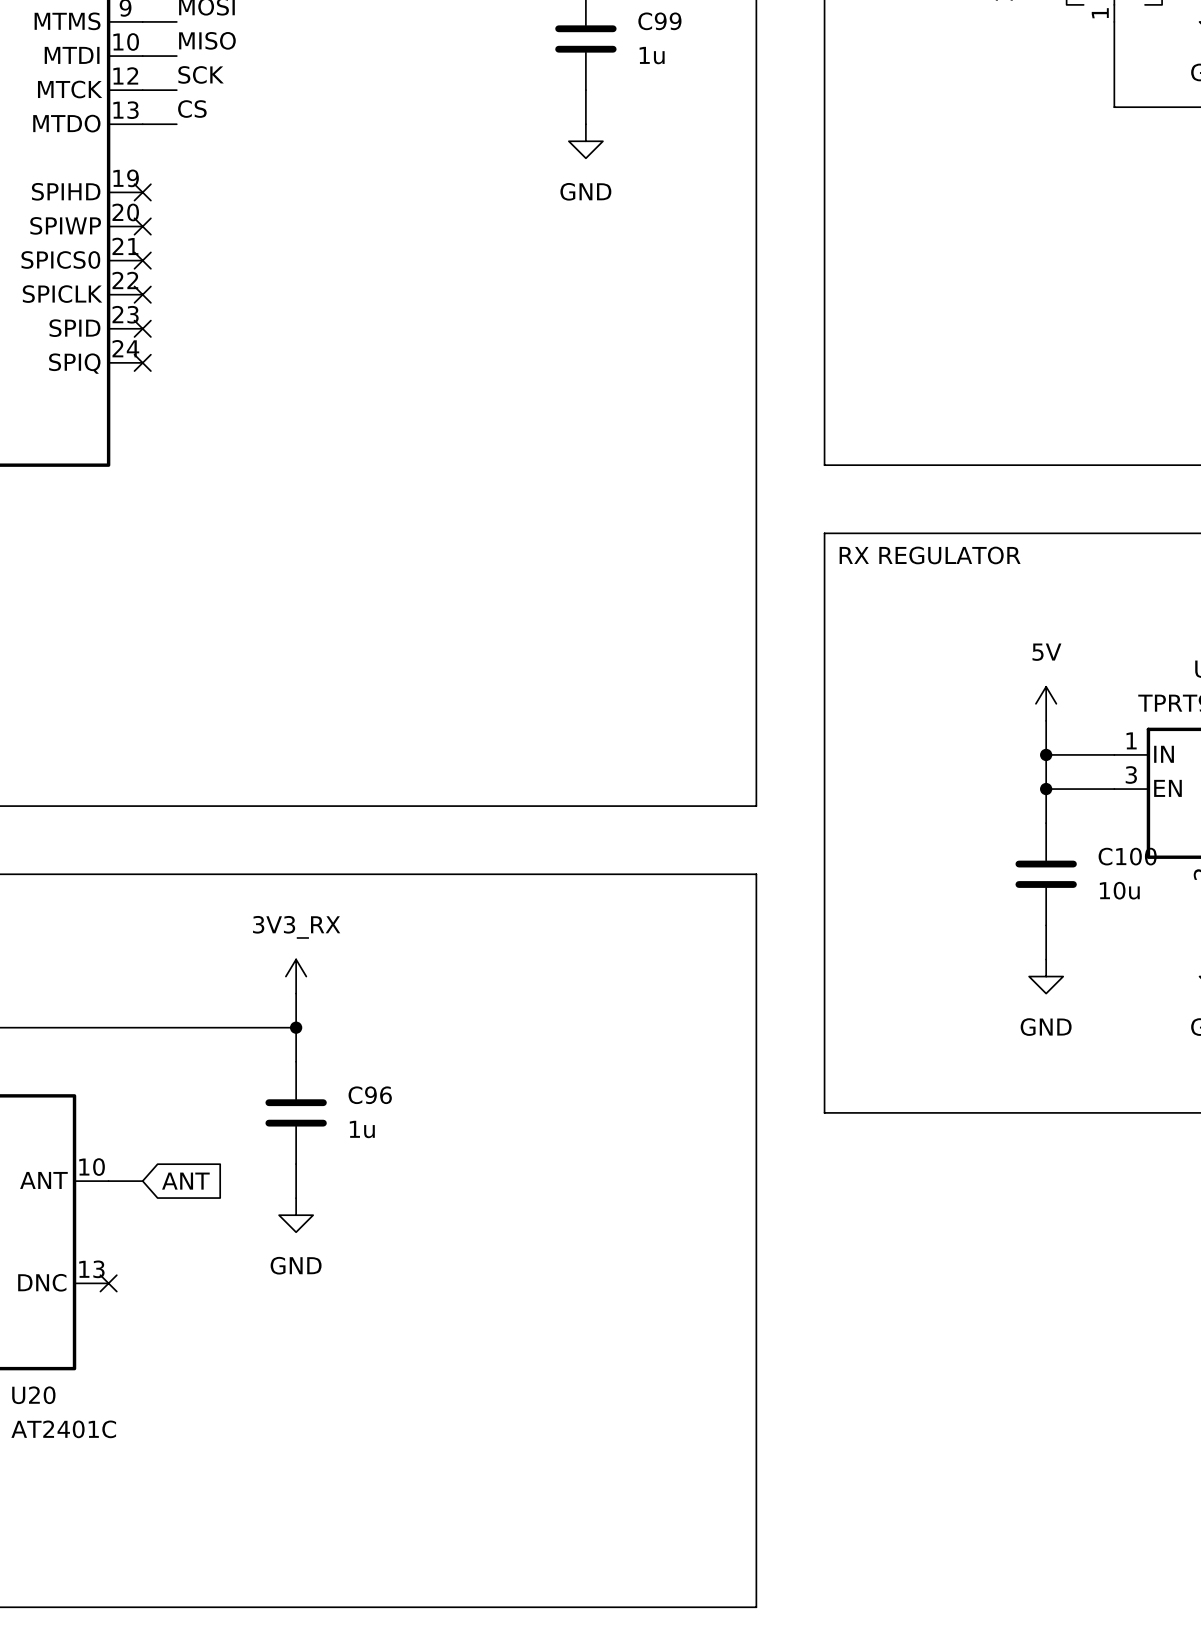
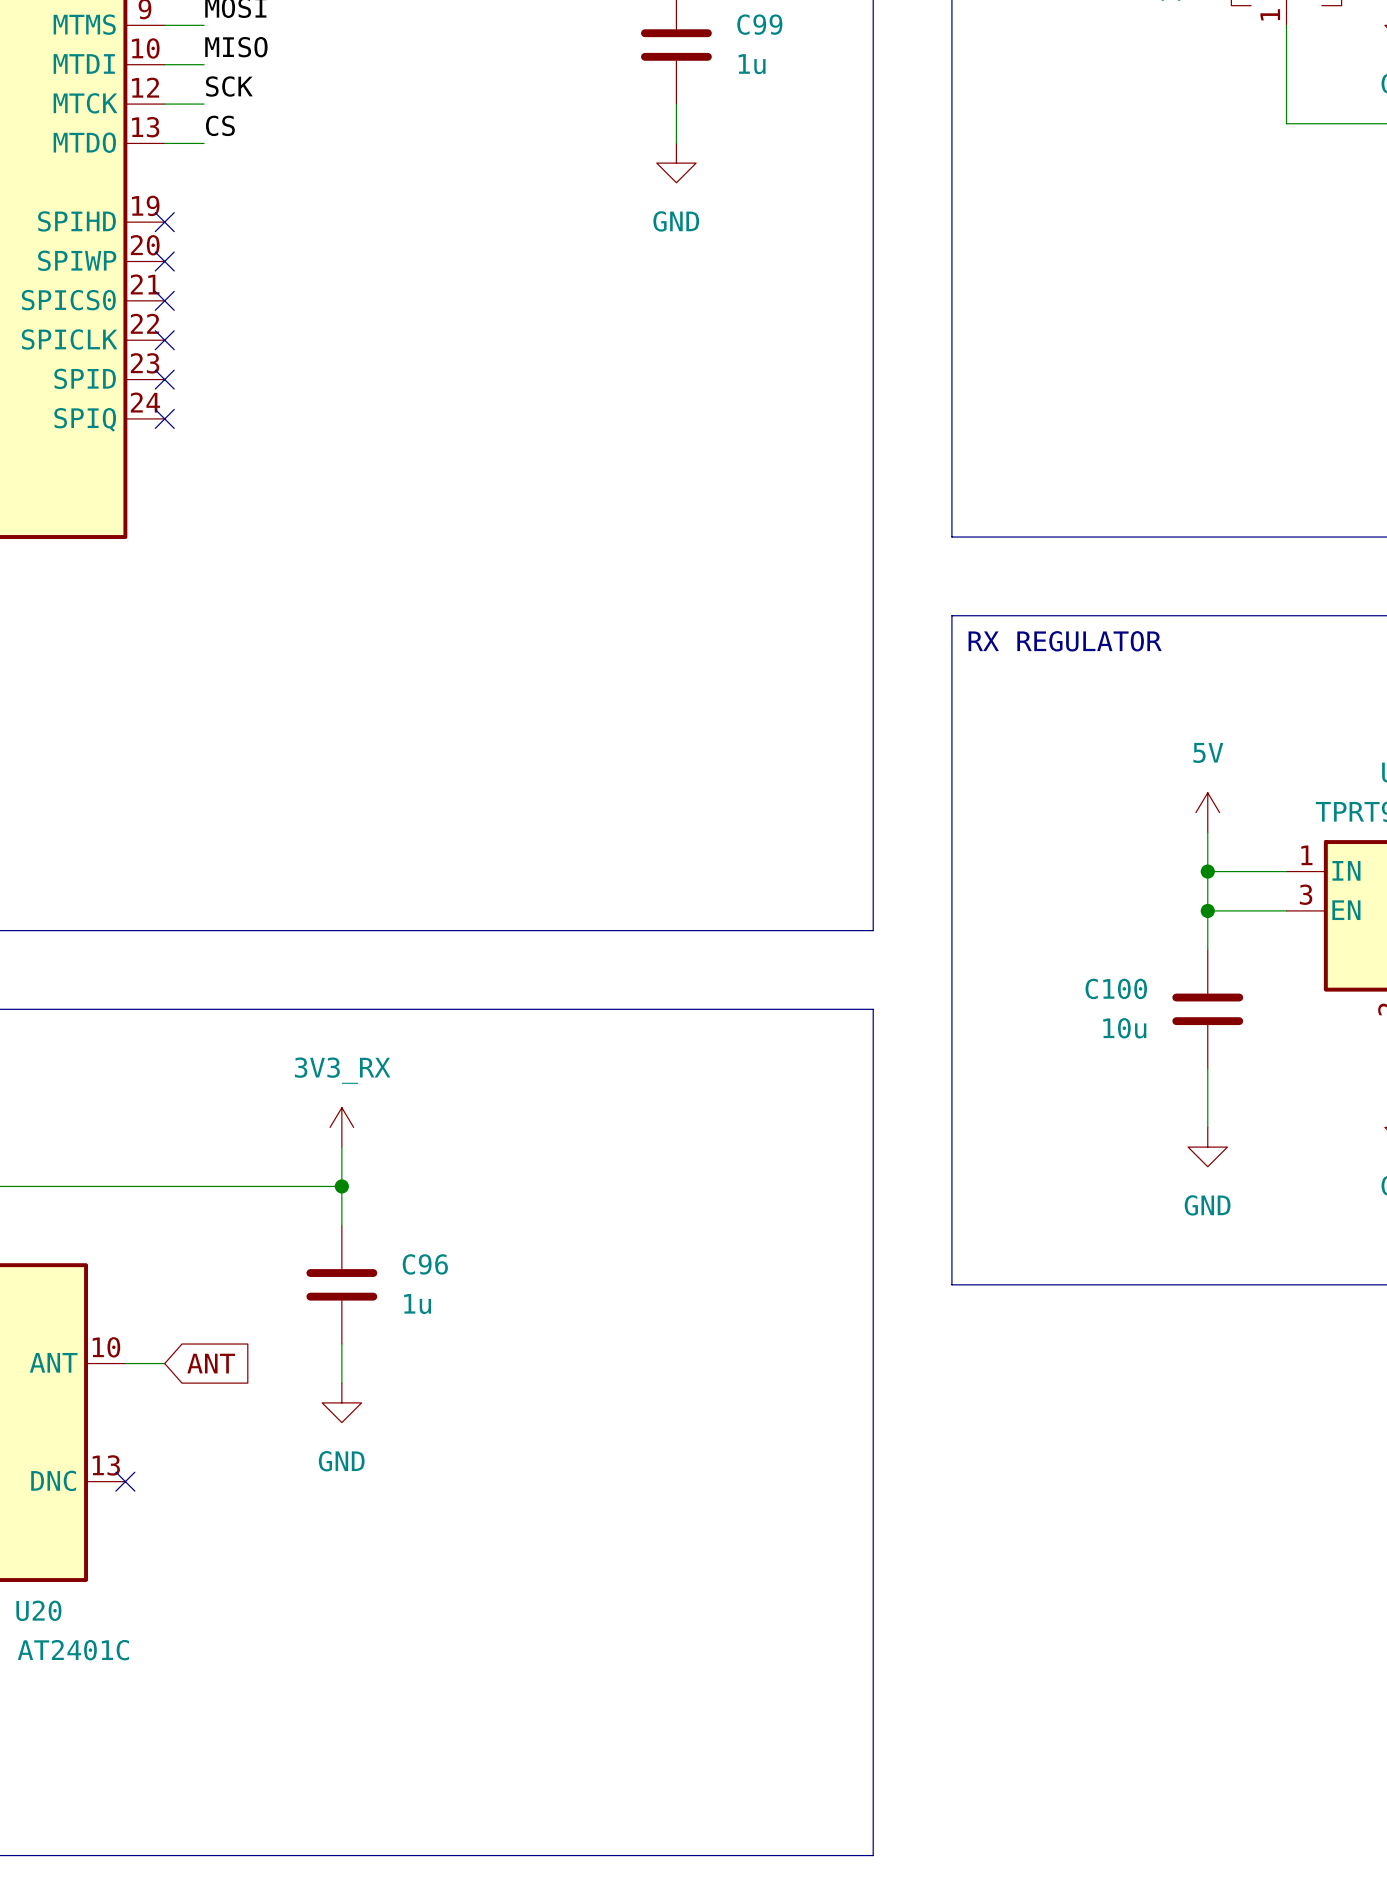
C100 name position: C100 (1127, 856) -> C100 (1116, 988)
C100 value position: 10u (1119, 890) -> 10u (1124, 1028)
power symbol position: GND (1046, 976) -> GND (1207, 1147)

